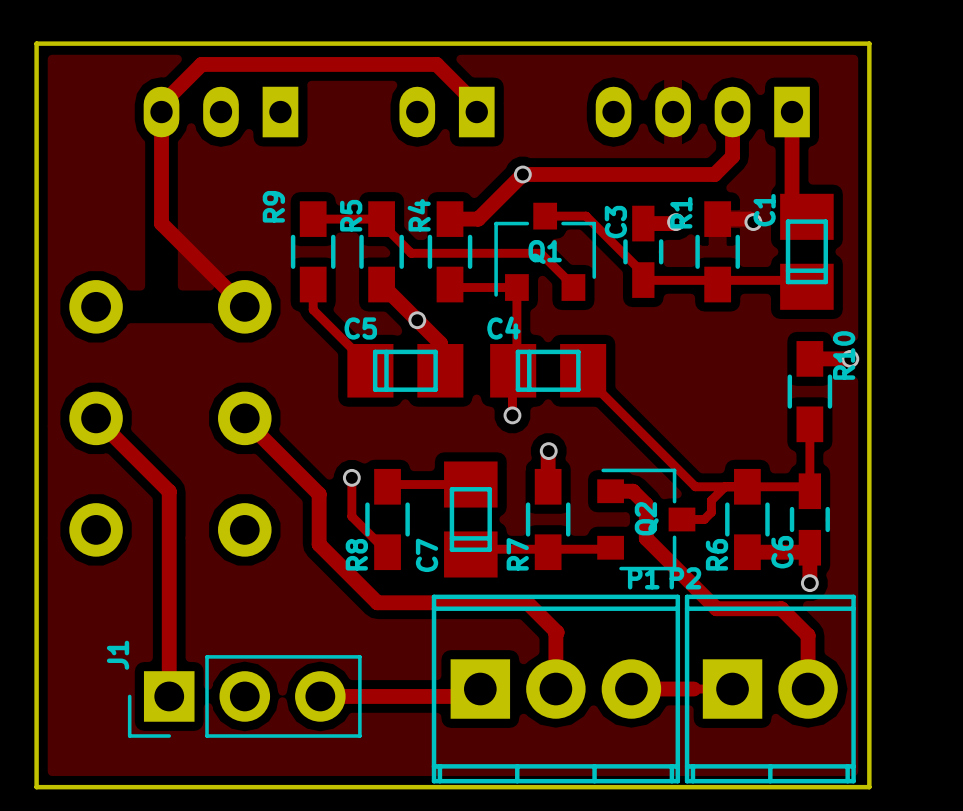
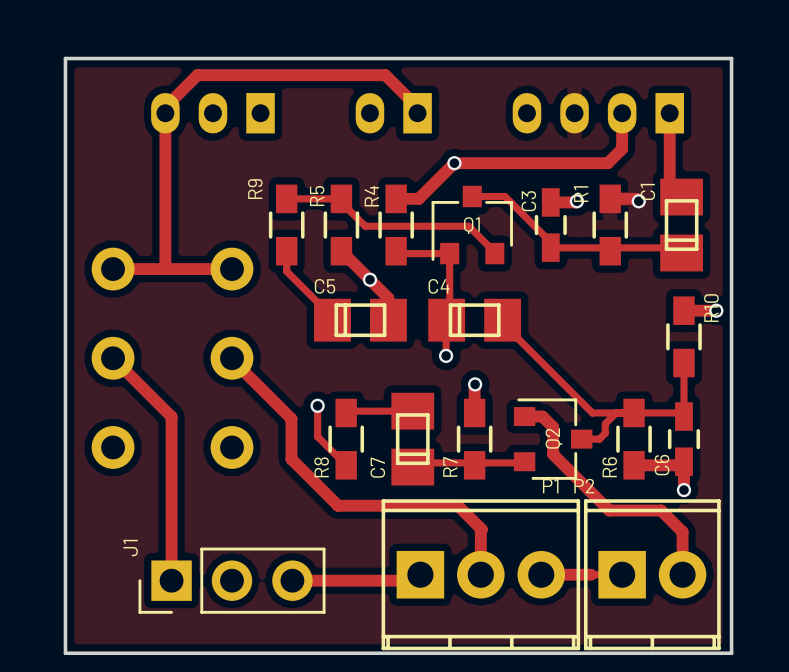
track: (161, 223) (244, 306) -> (165, 202) (165, 266) (163, 269)
track: none -> (113, 269) (232, 269)

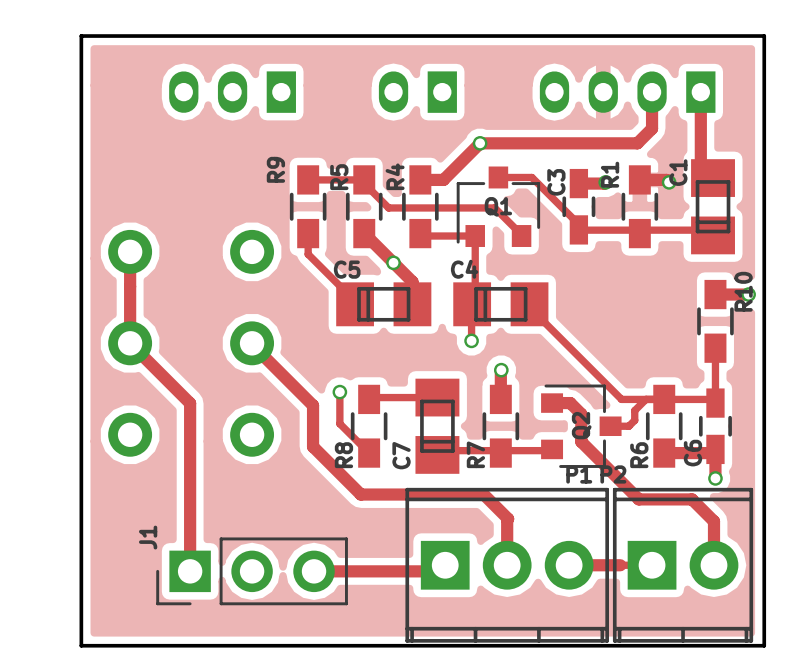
track: (417, 113) (417, 107) (385, 75) (197, 75) (165, 107) (165, 266) (163, 269) -> none
track: (113, 269) (232, 269) -> none
track: none -> (130, 255) (130, 344)

